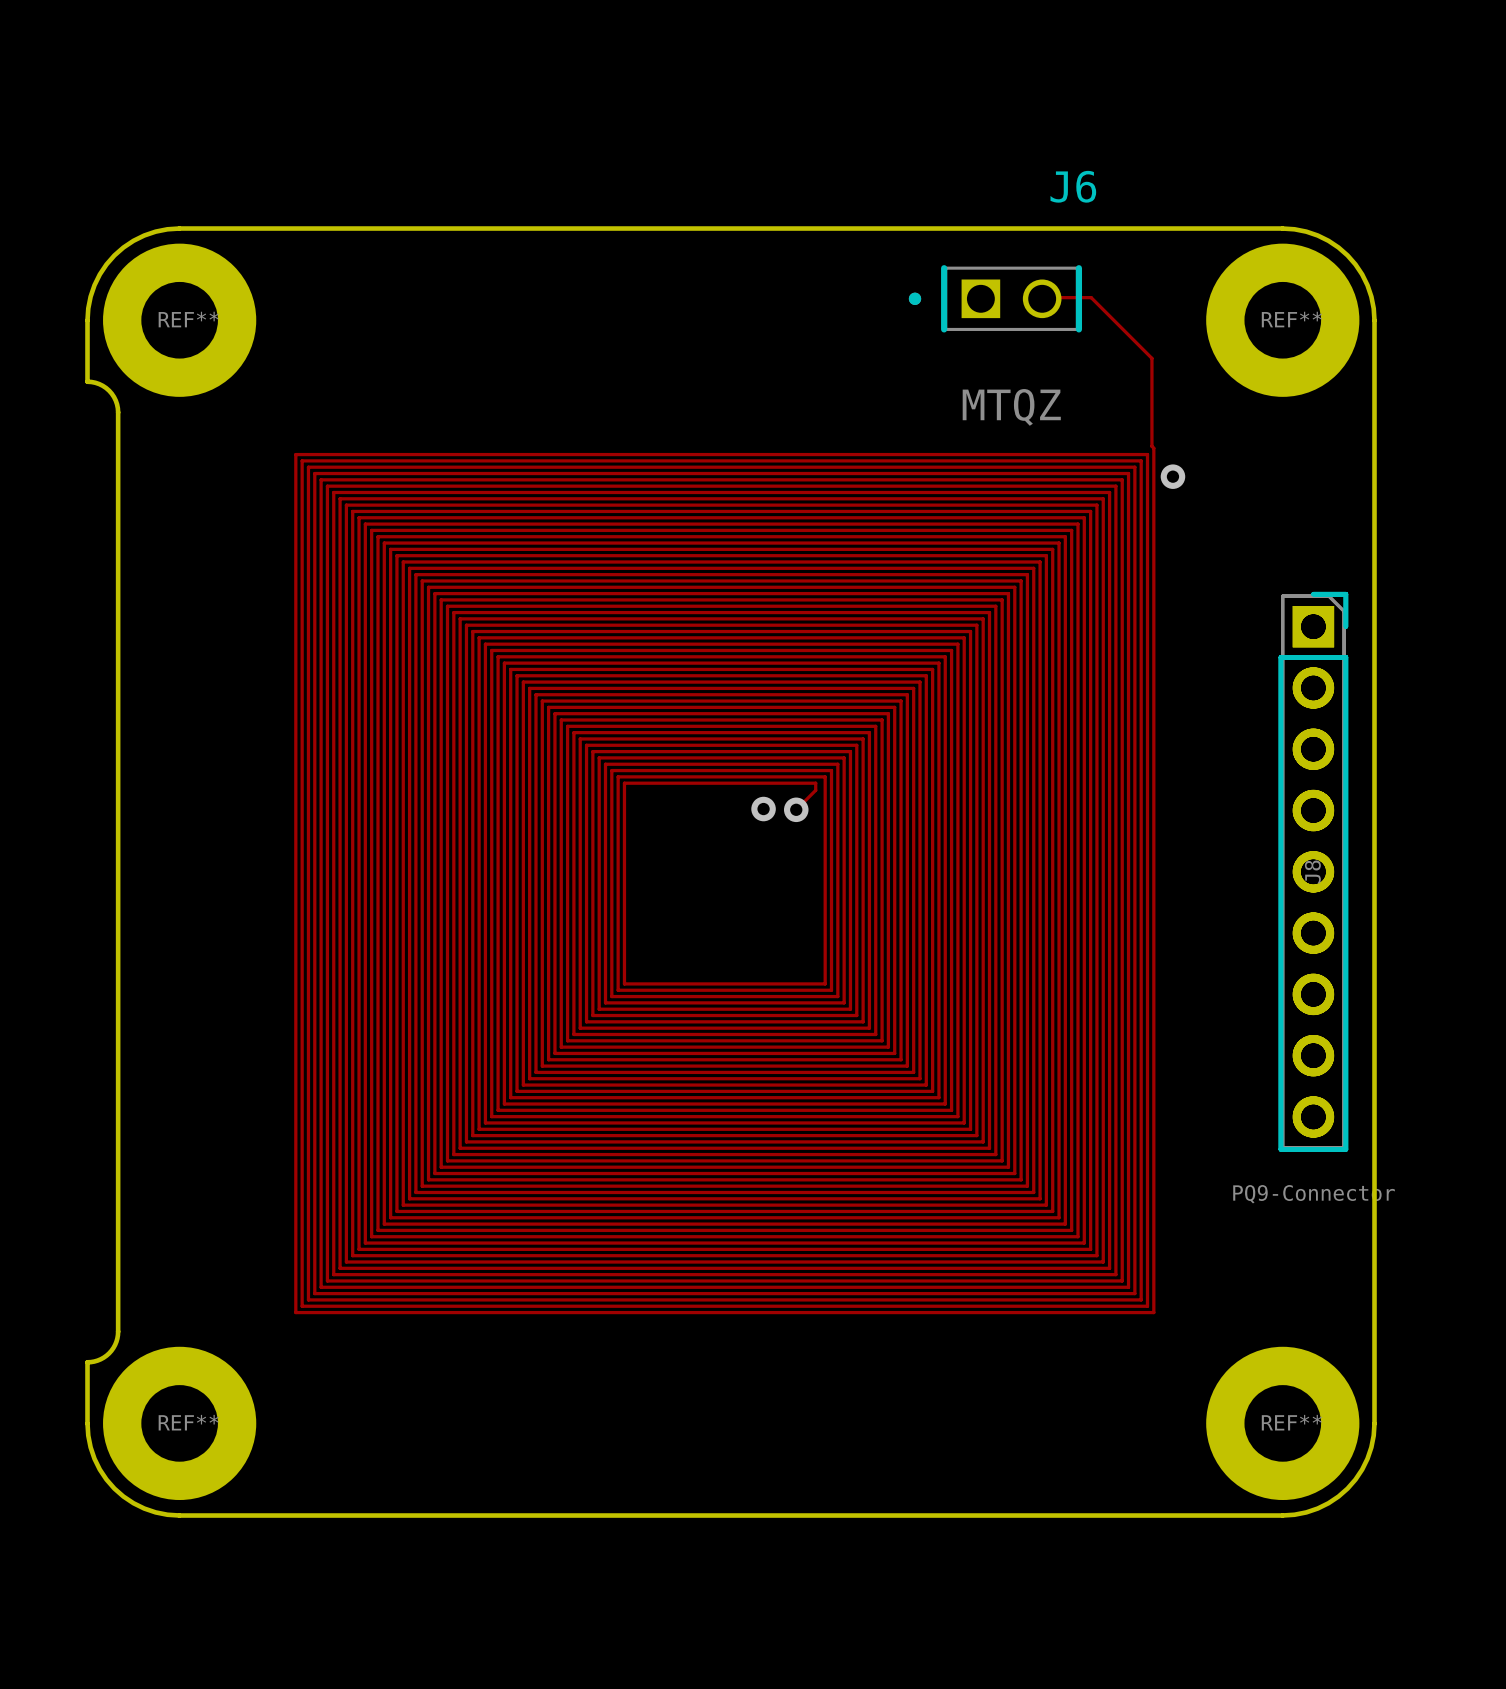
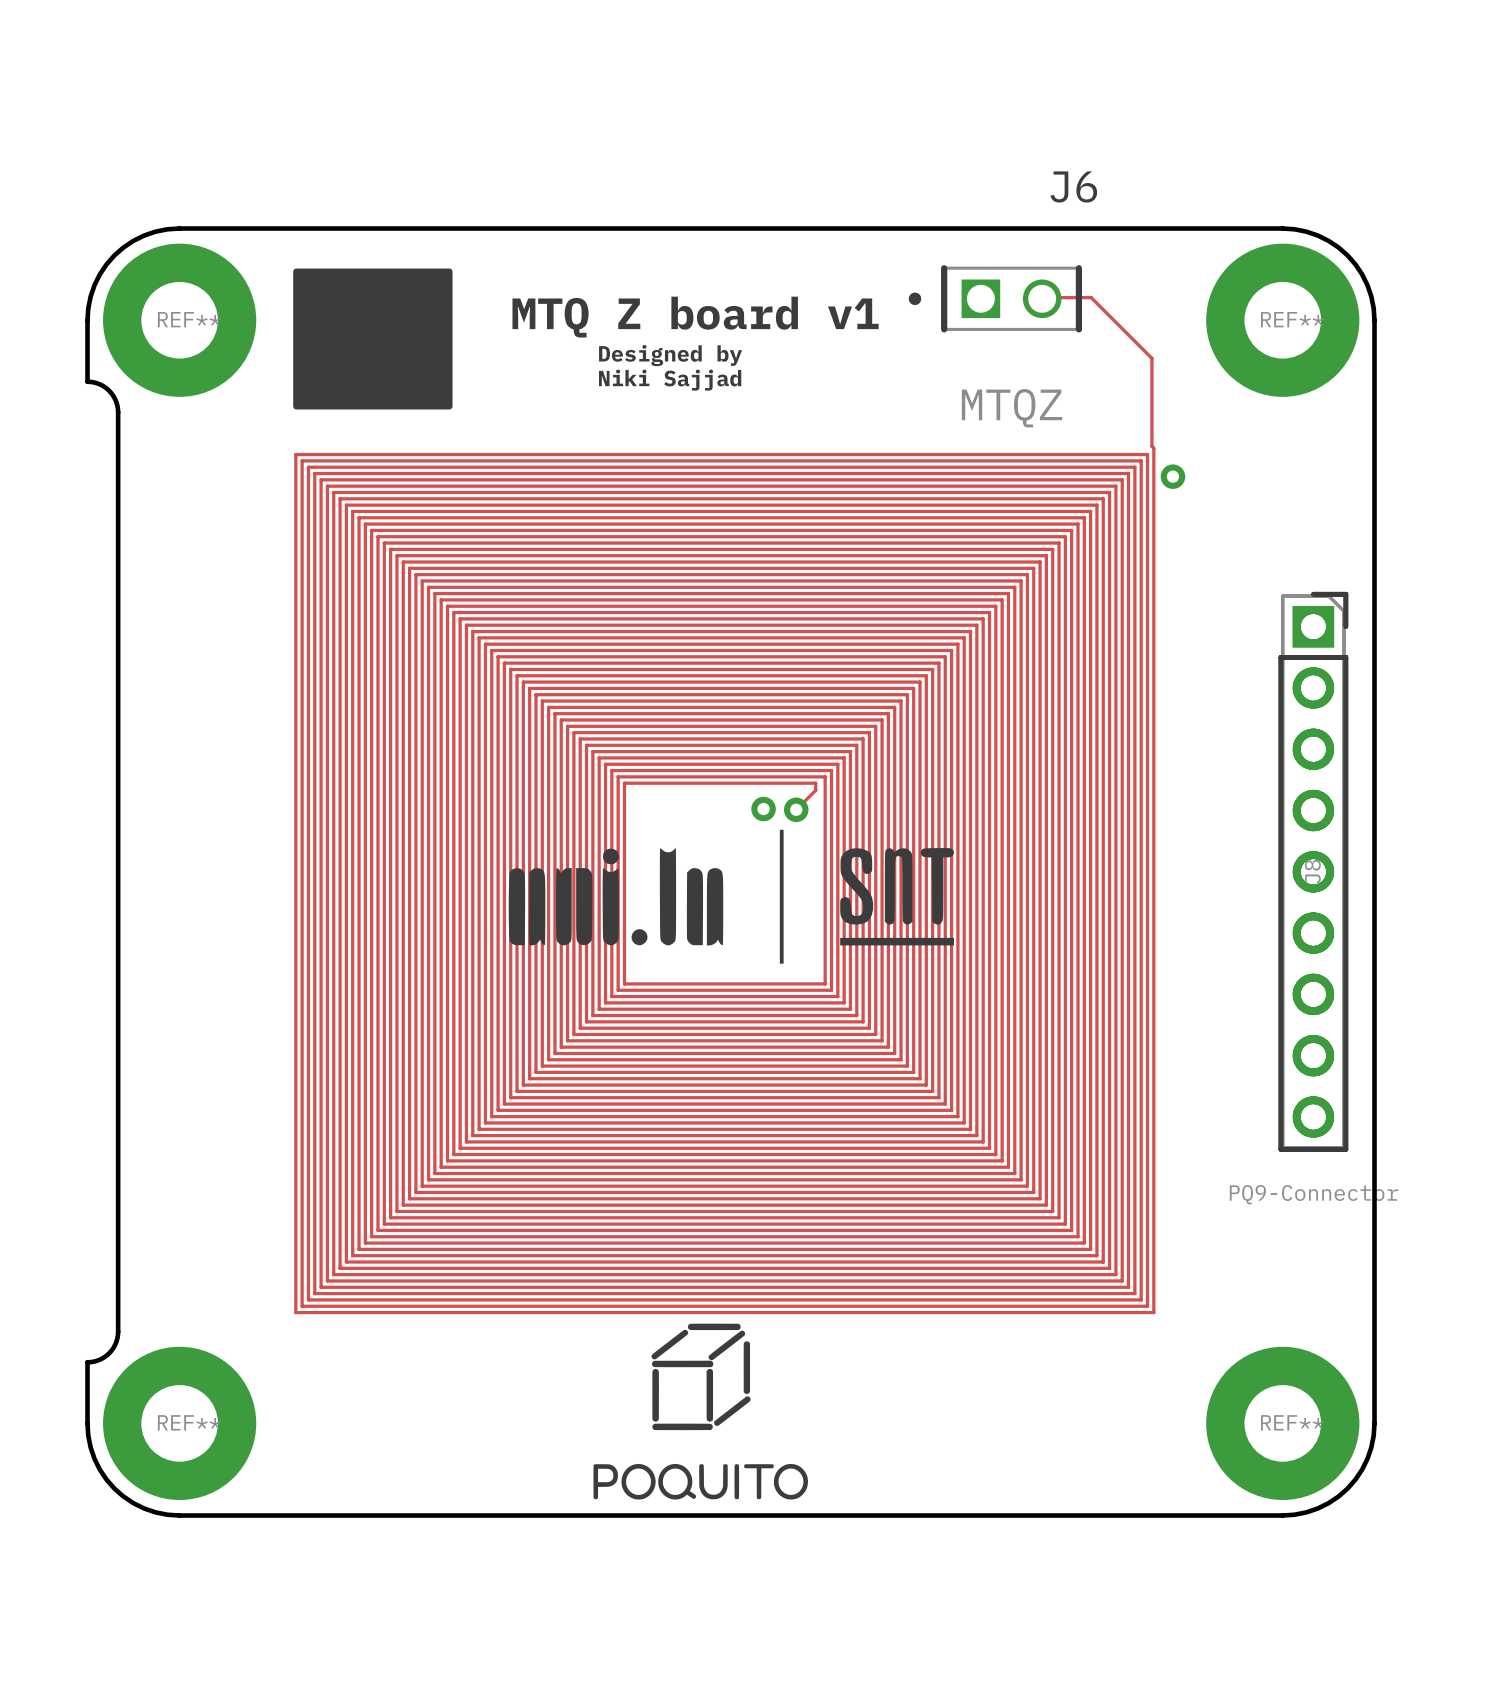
drawing: none -> [293, 268, 453, 410]
text: none -> MTQ Z board v1 (695, 317)
text: none -> Designed by (670, 355)
text: none -> Niki Sajjad (670, 380)
drawing: none -> [508, 829, 955, 964]
drawing: none -> [593, 1323, 808, 1500]

